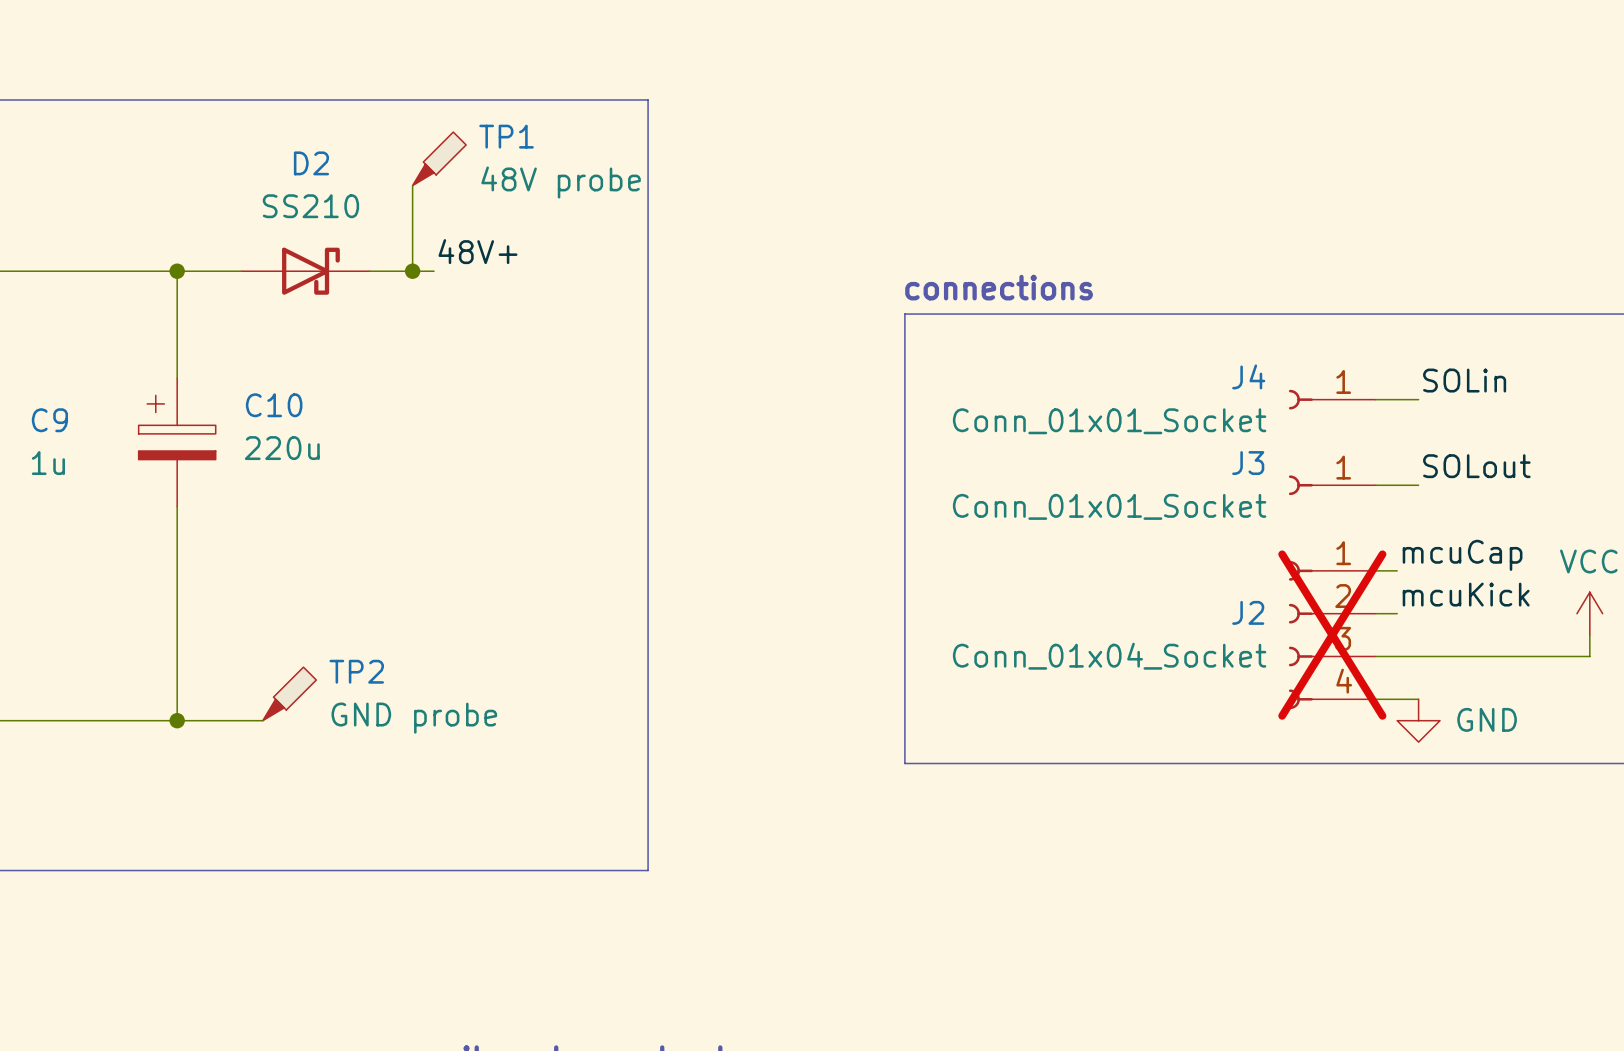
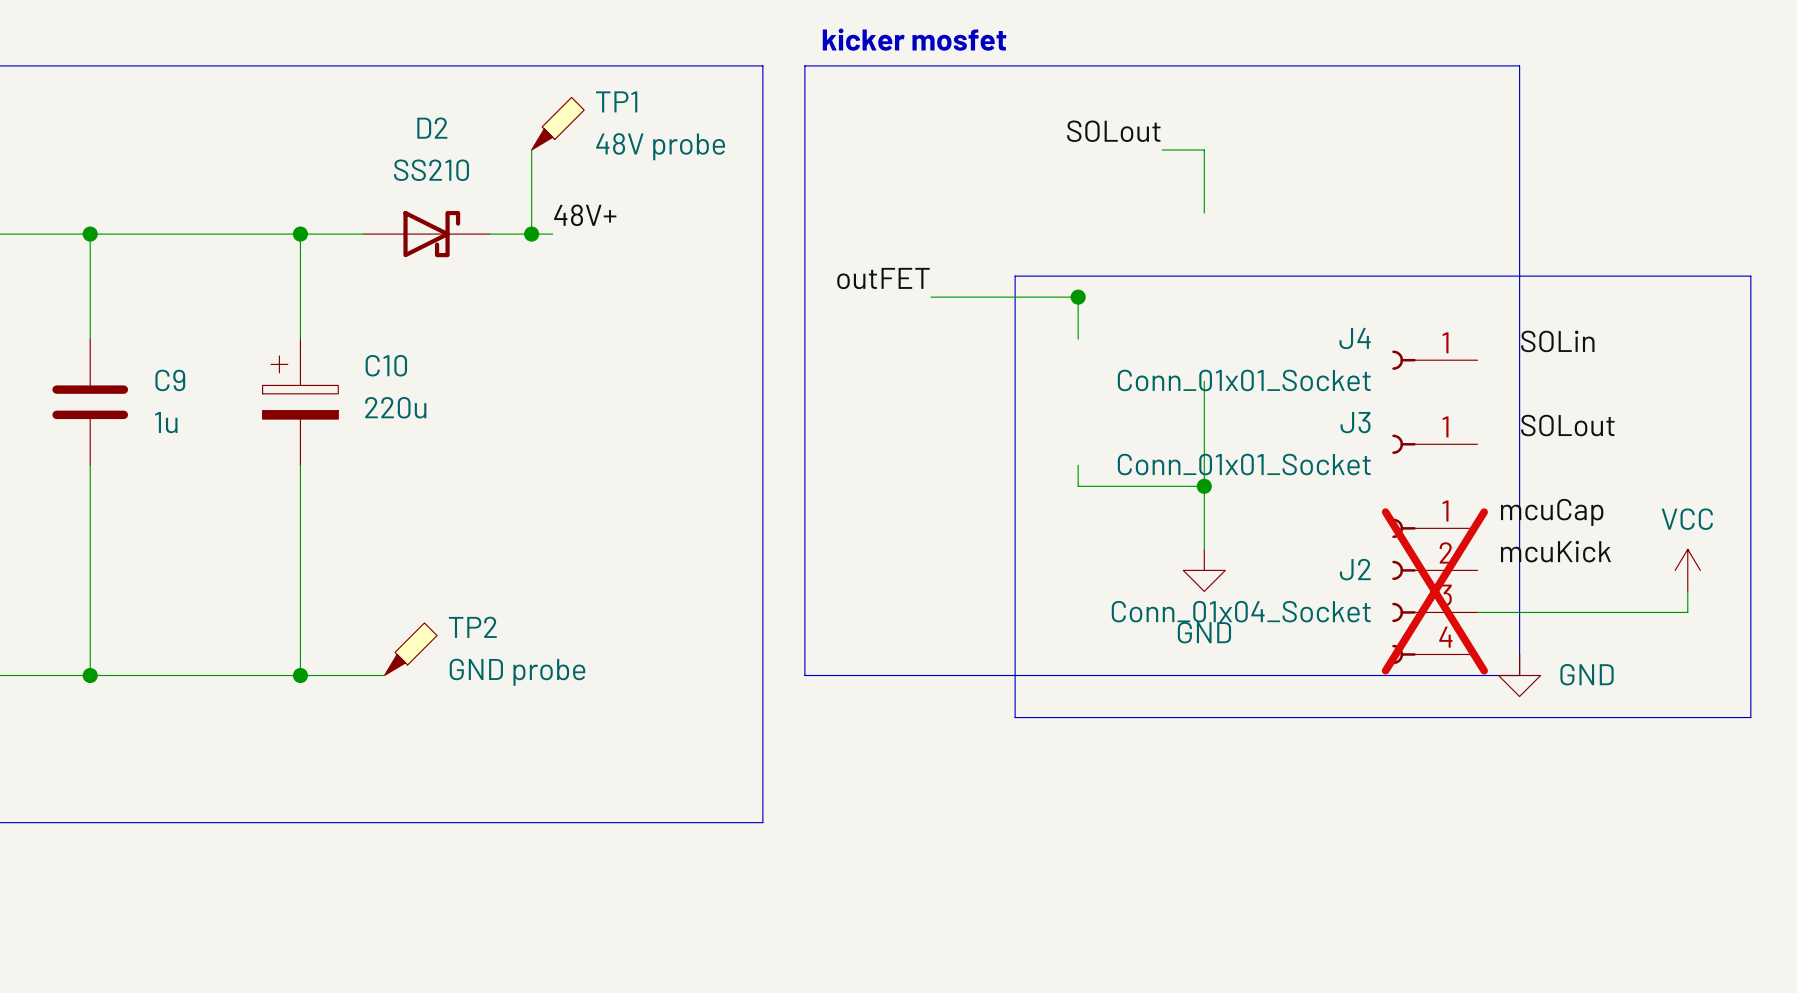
text: none -> kicker mosfet (914, 39)
line: none -> (804, 65) (1519, 65) (1519, 675) (804, 675) (804, 65)
label: none -> SOLout (1113, 131)
wire: none -> (1162, 149) (1204, 149) (1204, 213)
text: connections (999, 287) -> none
label: none -> outFET (883, 278)
wire: none -> (931, 297) (1078, 297) (1078, 339)
junction: none -> (1078, 297)
wire: (1375, 399) (1418, 399) -> none
wire: none -> (1204, 381) (1204, 549)
wire: (1375, 485) (1418, 485) -> none
wire: none -> (1078, 465) (1078, 486) (1204, 486)
junction: none -> (1204, 486)
wire: (1375, 570) (1397, 570) -> none
power symbol: none -> GND (1204, 570)
wire: (1375, 613) (1397, 613) -> none
wire: (1375, 699) (1418, 699) -> none

